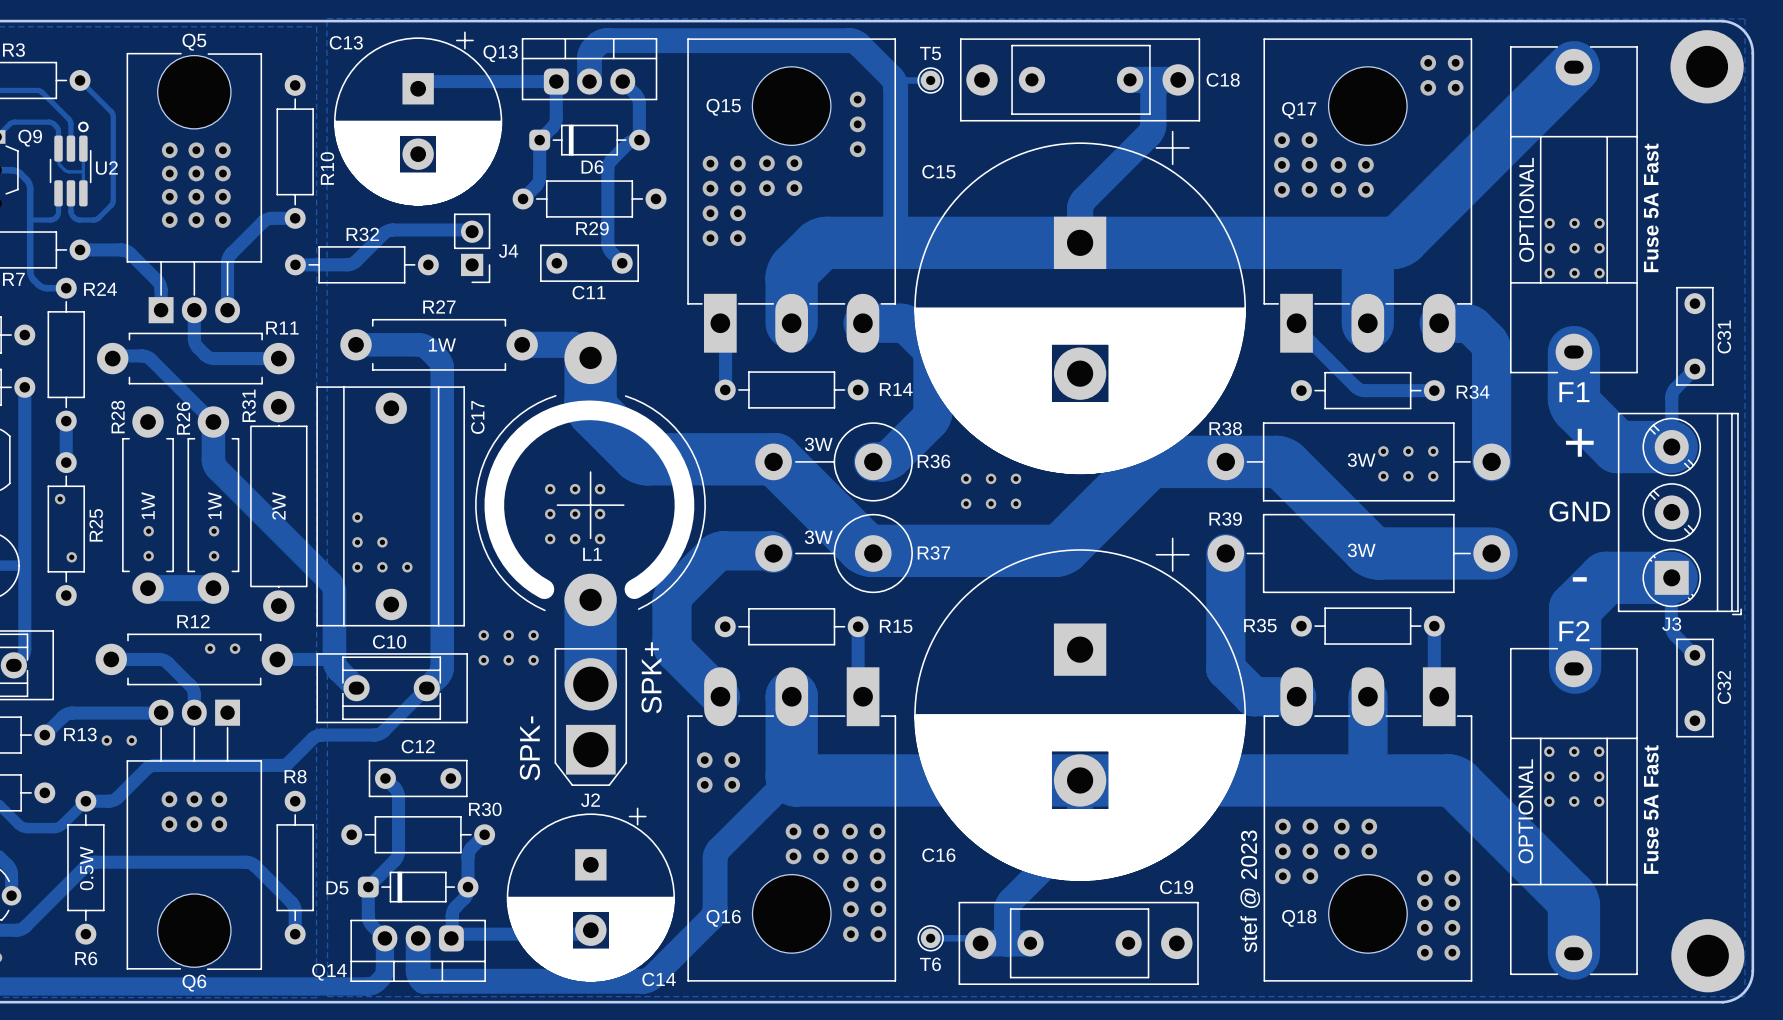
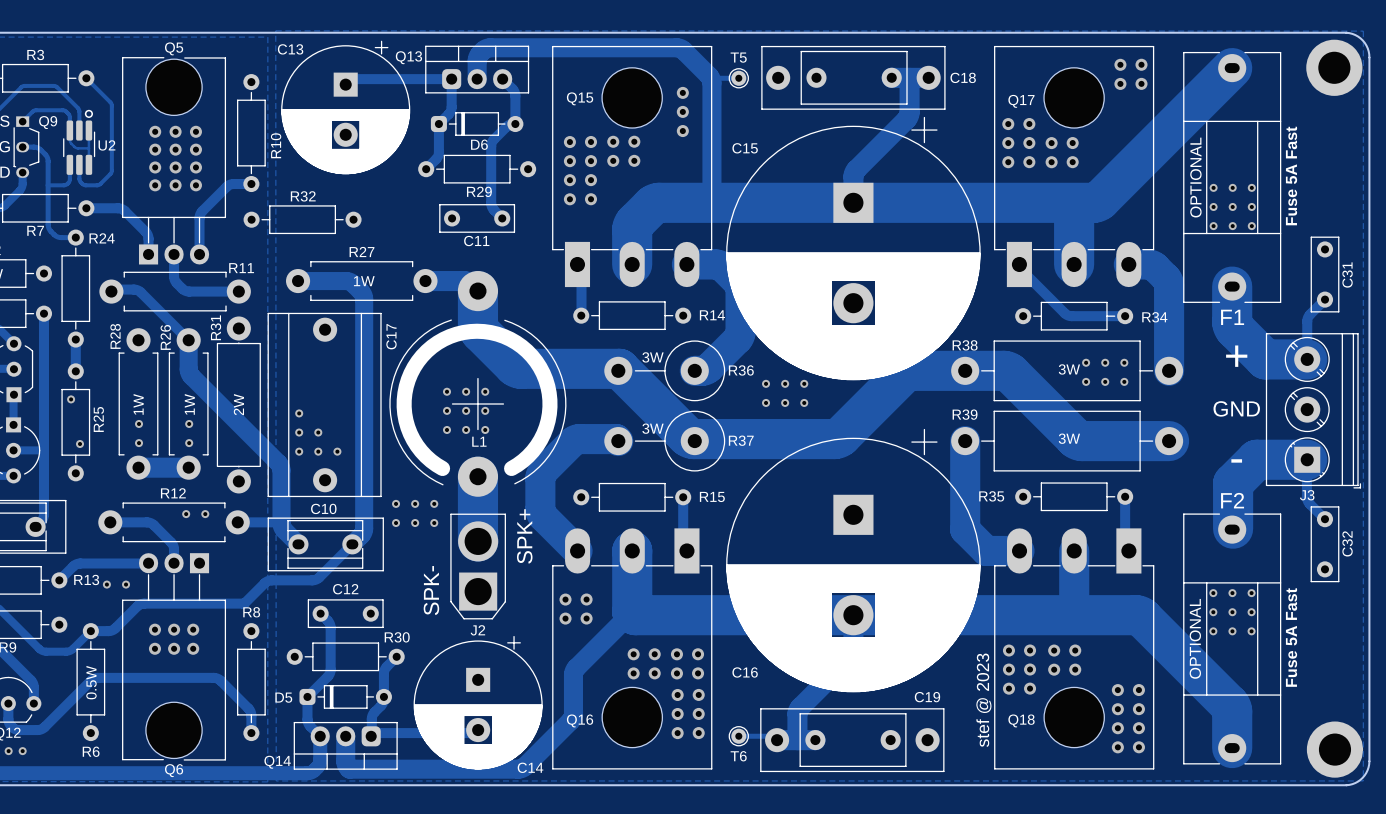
track: (470, 230) (390, 230) (384, 232) (352, 263) (295, 264) -> none
J4: (472, 248) -> none

